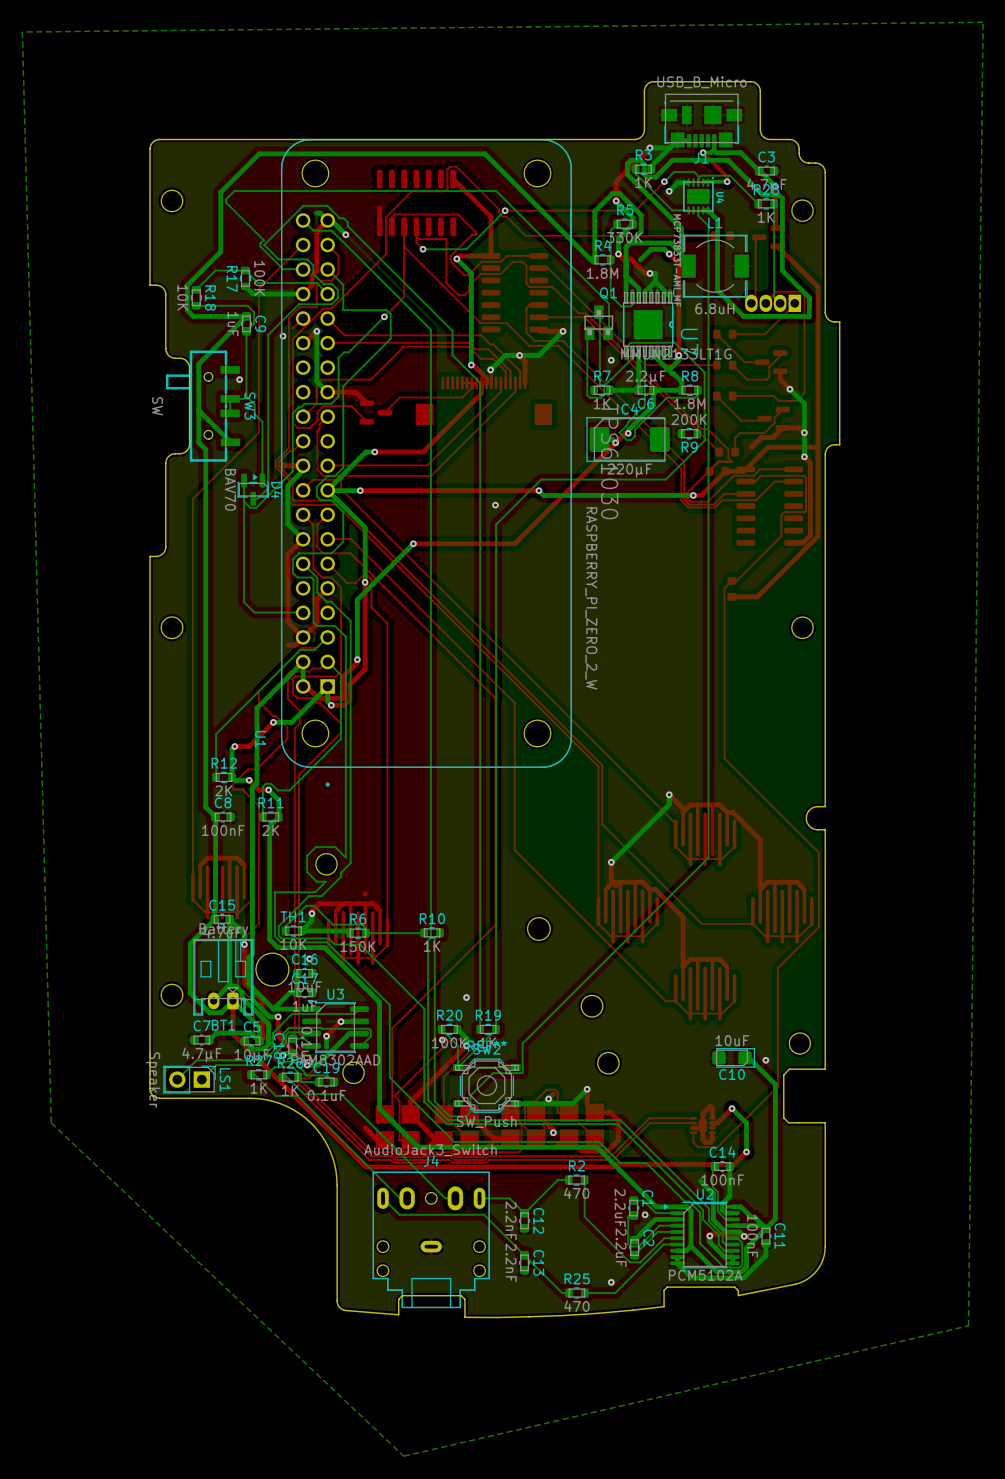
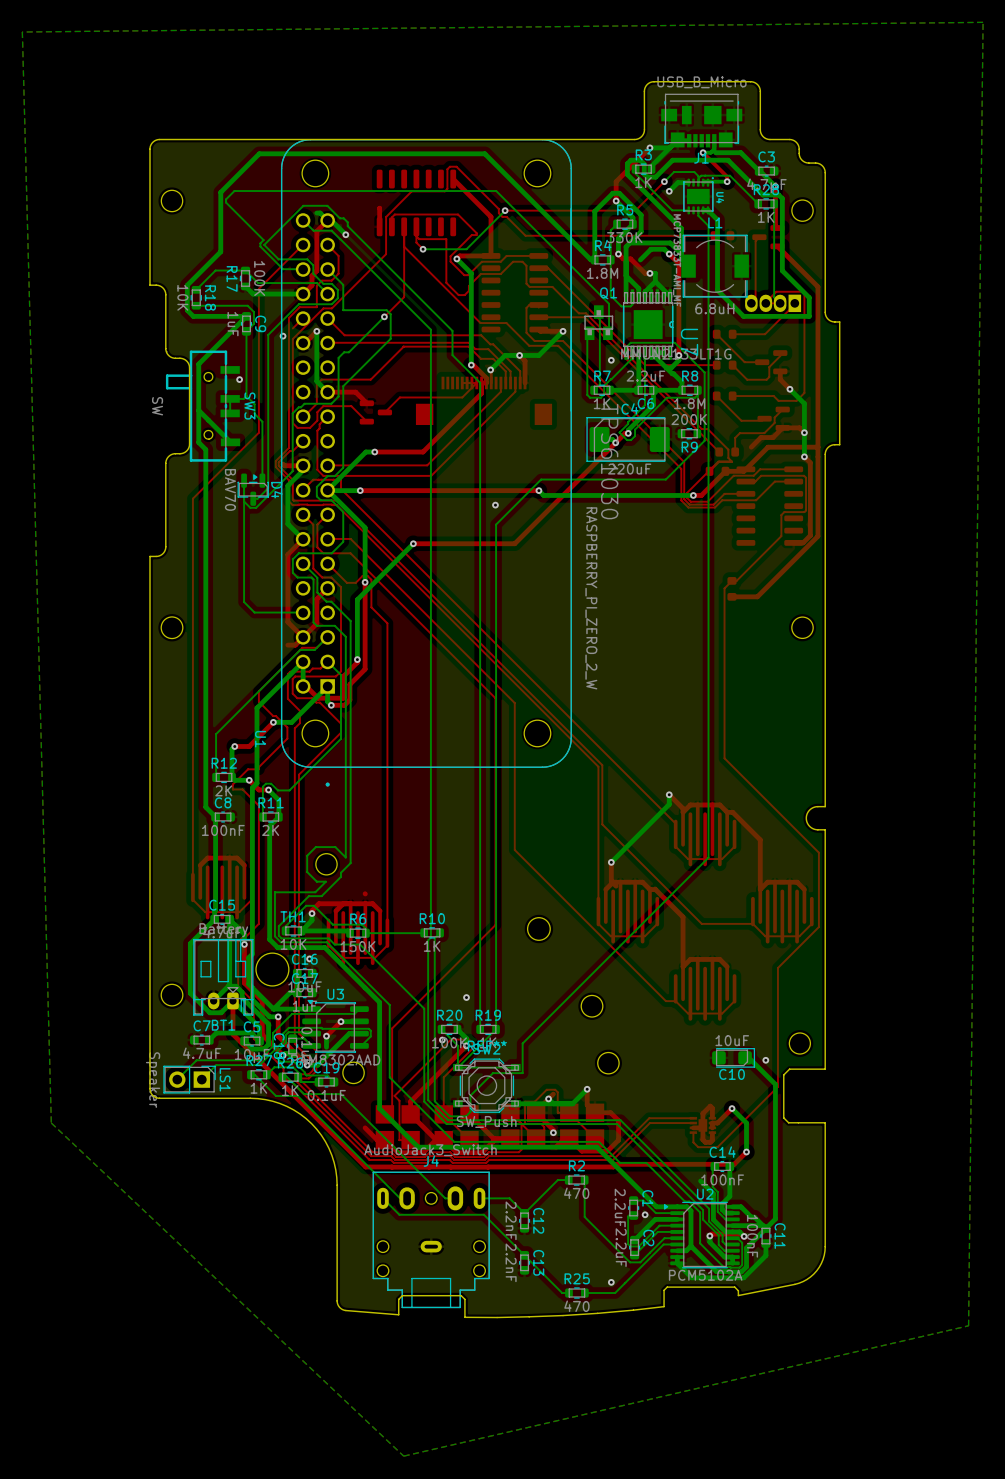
C6 value: 2.2µF (645, 377) -> 2.2uF (645, 376)
C4 value: 220µF (629, 470) -> 220uF (629, 469)
C7 value: 4.7µF (202, 1054) -> 4.7uF (202, 1053)

